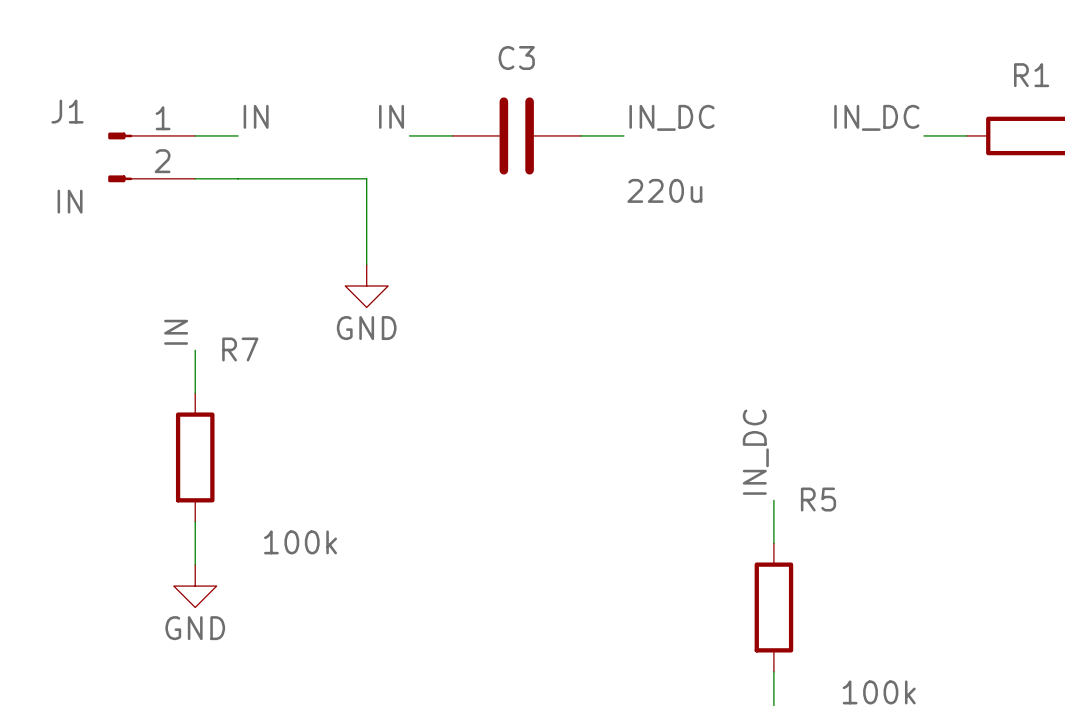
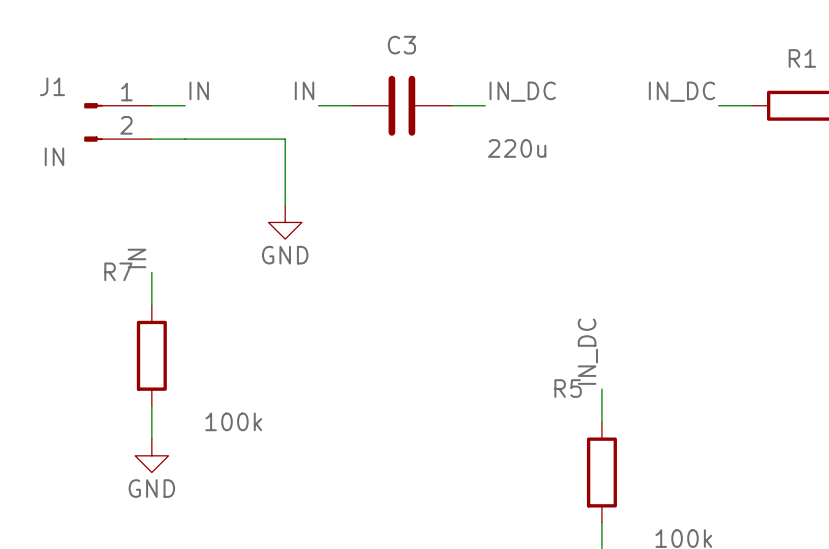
R7 name position: R7 (240, 349) -> R7 (118, 271)
R5 name position: R5 (818, 499) -> R5 (568, 388)

